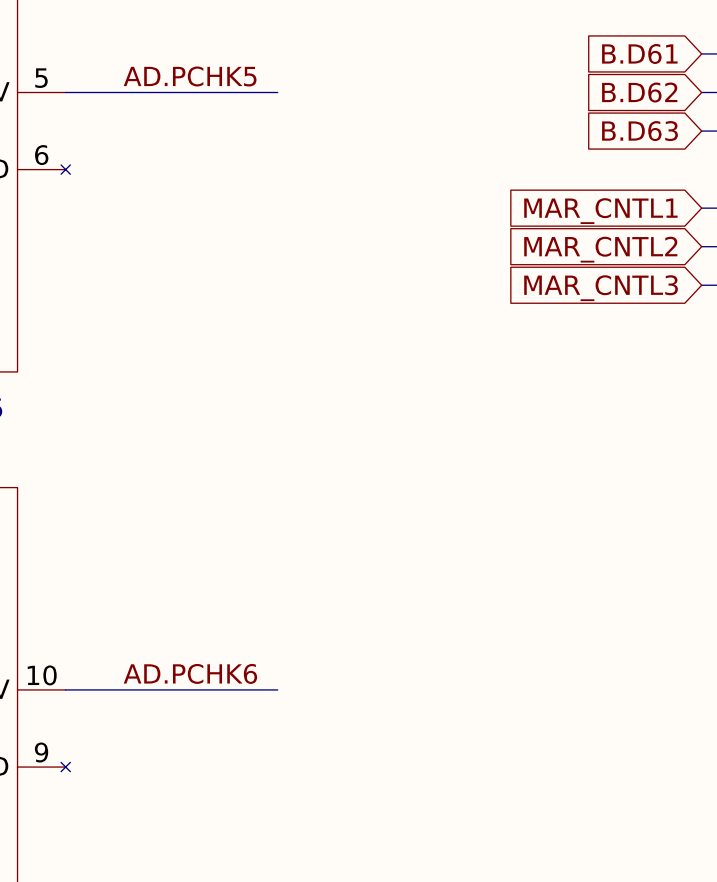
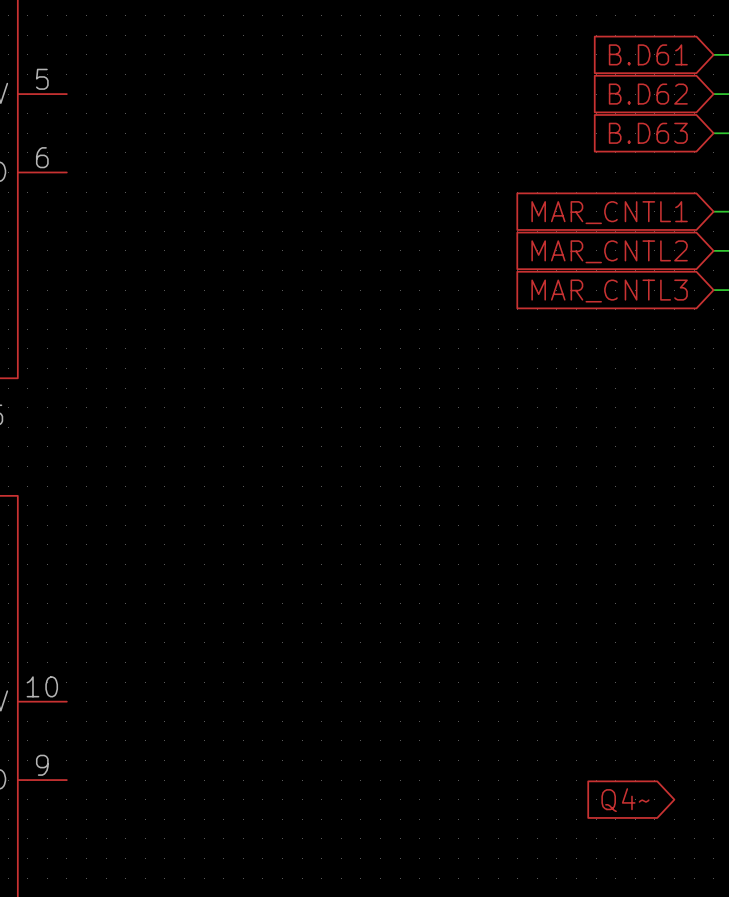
label: AD.PCHK5 (190, 76) -> none
wire: (65, 92) (277, 92) -> none
no-connect mark: (65, 169) -> none
label: AD.PCHK6 (190, 673) -> none
wire: (65, 689) (277, 689) -> none
no-connect mark: (65, 767) -> none
global label: none -> Q4~ (625, 800)

